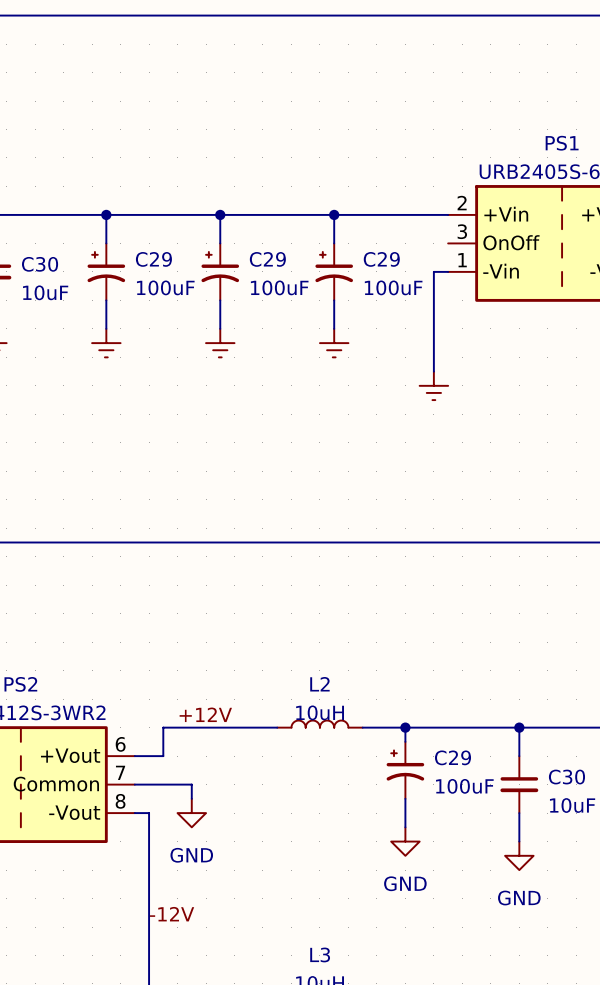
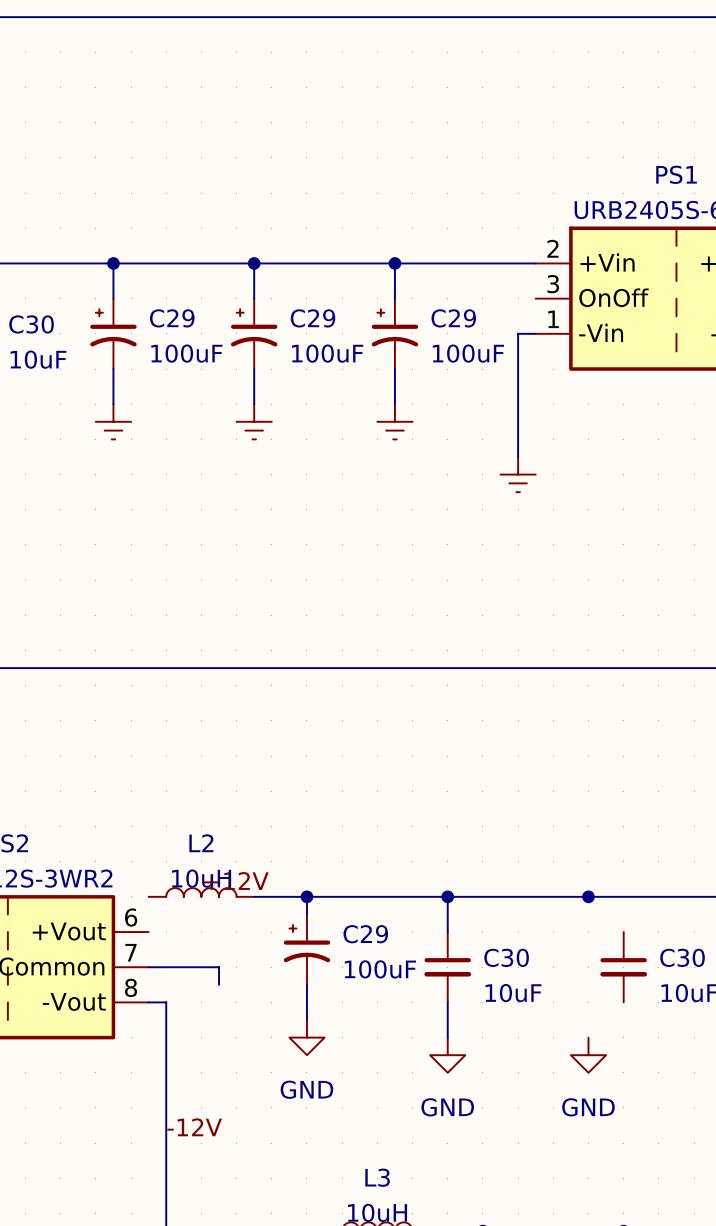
L2 position: (319, 724) -> (201, 892)
wire: (220, 727) (163, 727) (163, 756) (134, 756) -> none
junction: none -> (306, 896)
wire: none -> (324, 896) (430, 896)
wire: (405, 727) (405, 741) -> (306, 896) (306, 914)
junction position: (405, 727) -> (447, 896)
wire: (519, 727) (519, 756) -> (447, 896) (447, 932)
junction position: (519, 727) -> (588, 896)
C29 position: (405, 770) -> (306, 949)
C30: none -> 10uF (447, 967)
wire: (405, 798) (405, 827) -> (306, 984) (306, 1020)
power symbol: GND (191, 813) -> none
wire: (519, 813) (519, 841) -> (447, 1002) (447, 1037)
power symbol: none -> GND (306, 1037)
power symbol position: GND (405, 841) -> GND (447, 1055)
power symbol position: GND (519, 855) -> GND (588, 1055)

